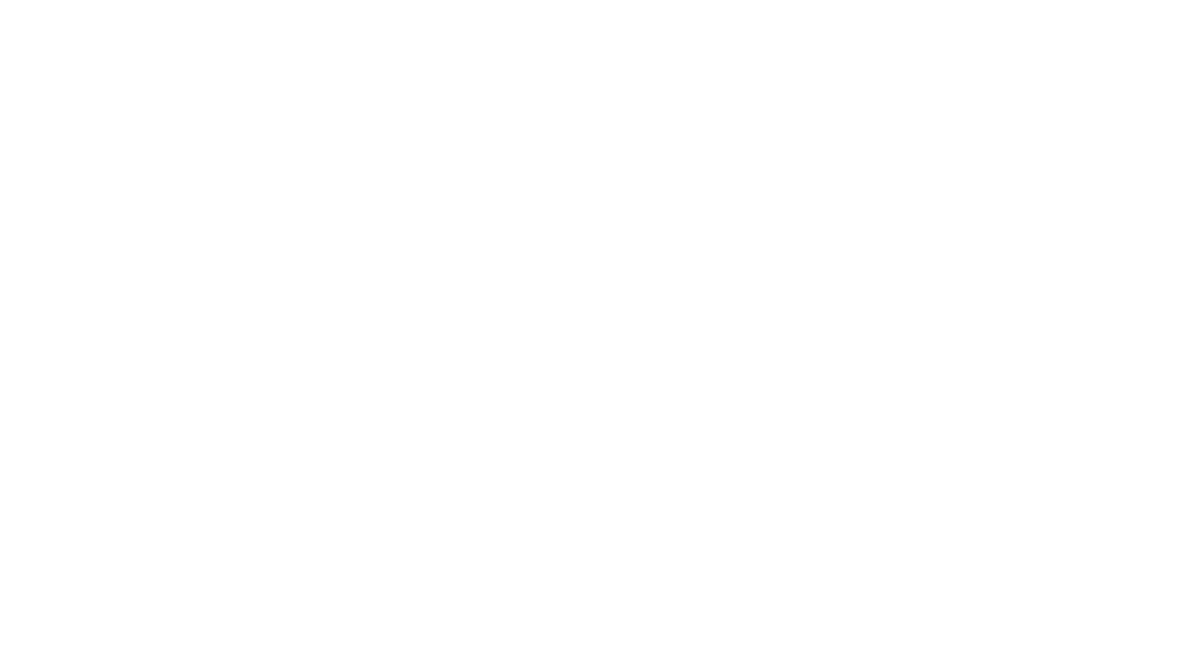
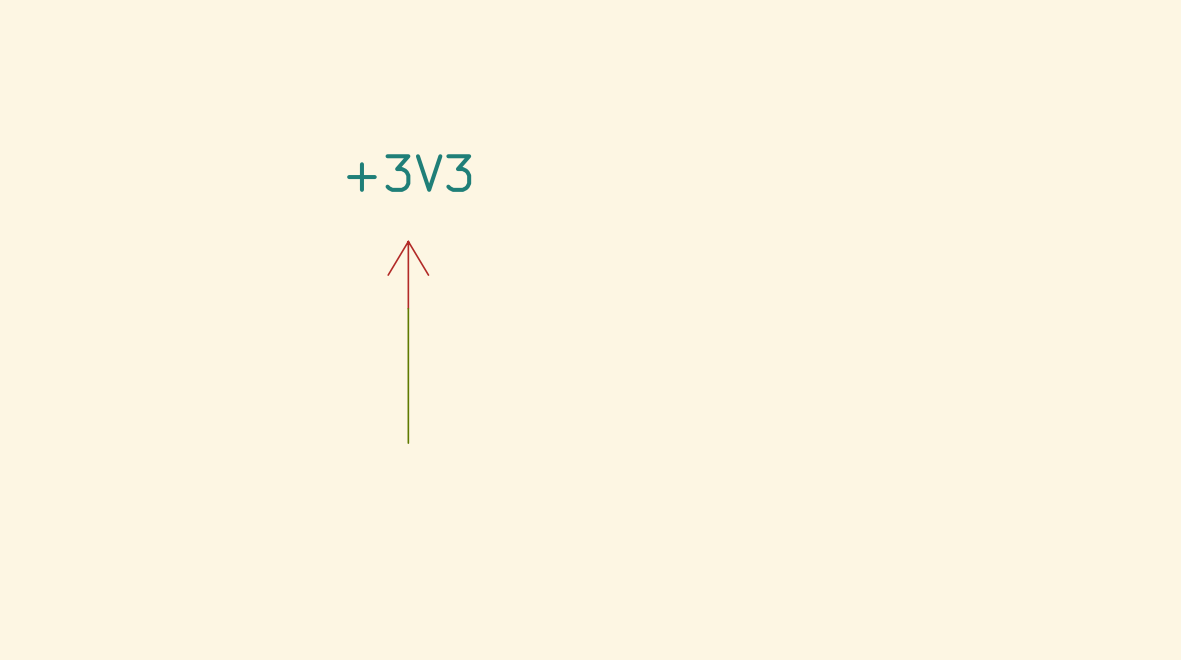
power symbol: none -> +3V3 (408, 275)
wire: none -> (408, 308) (408, 443)

